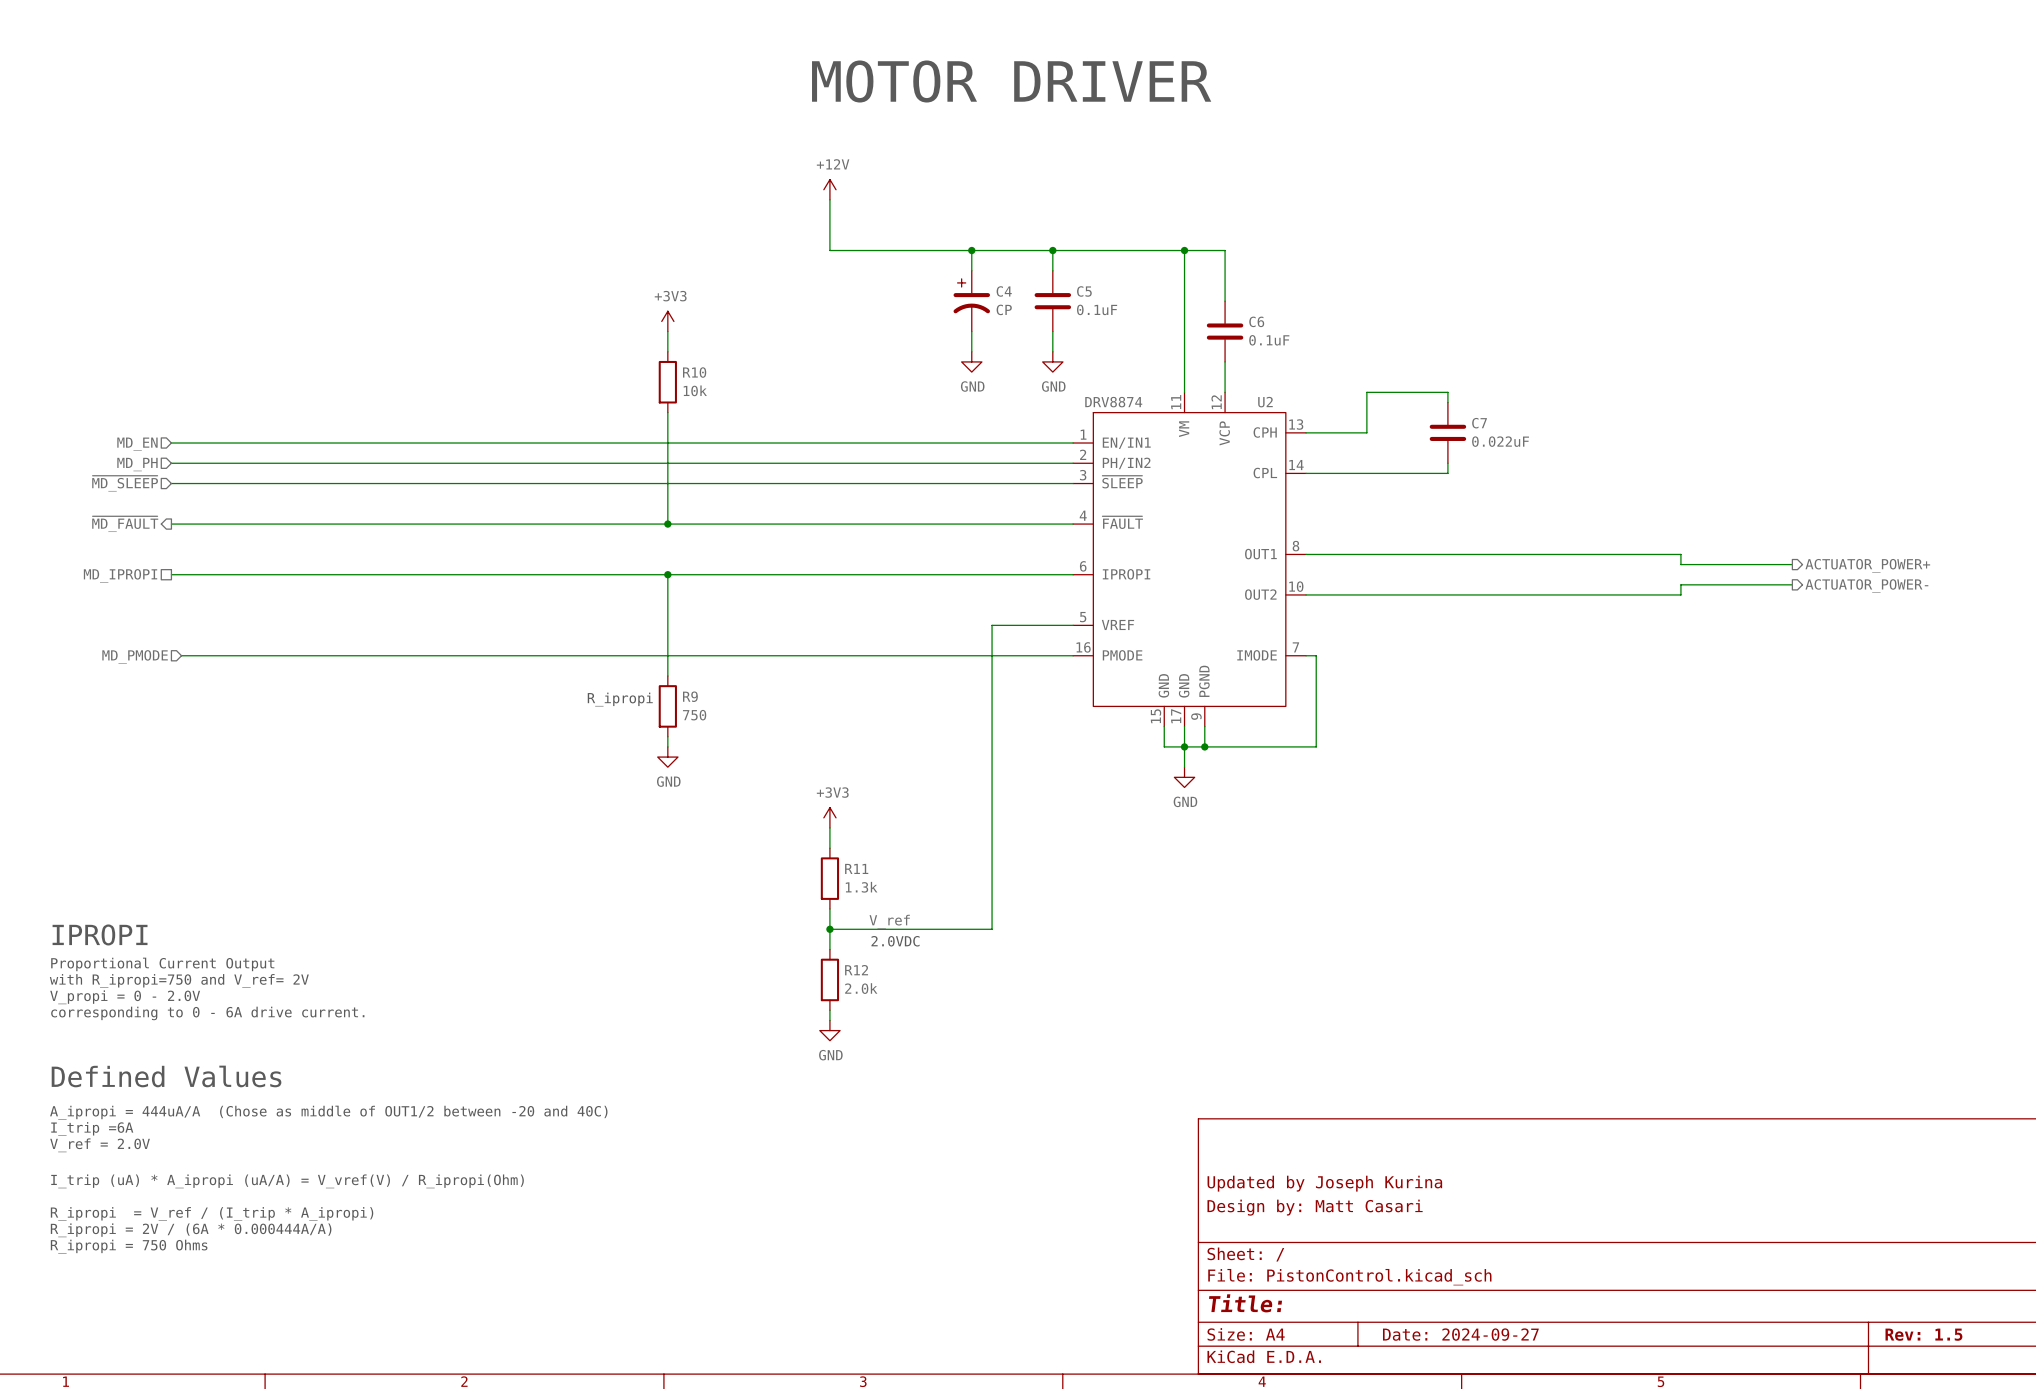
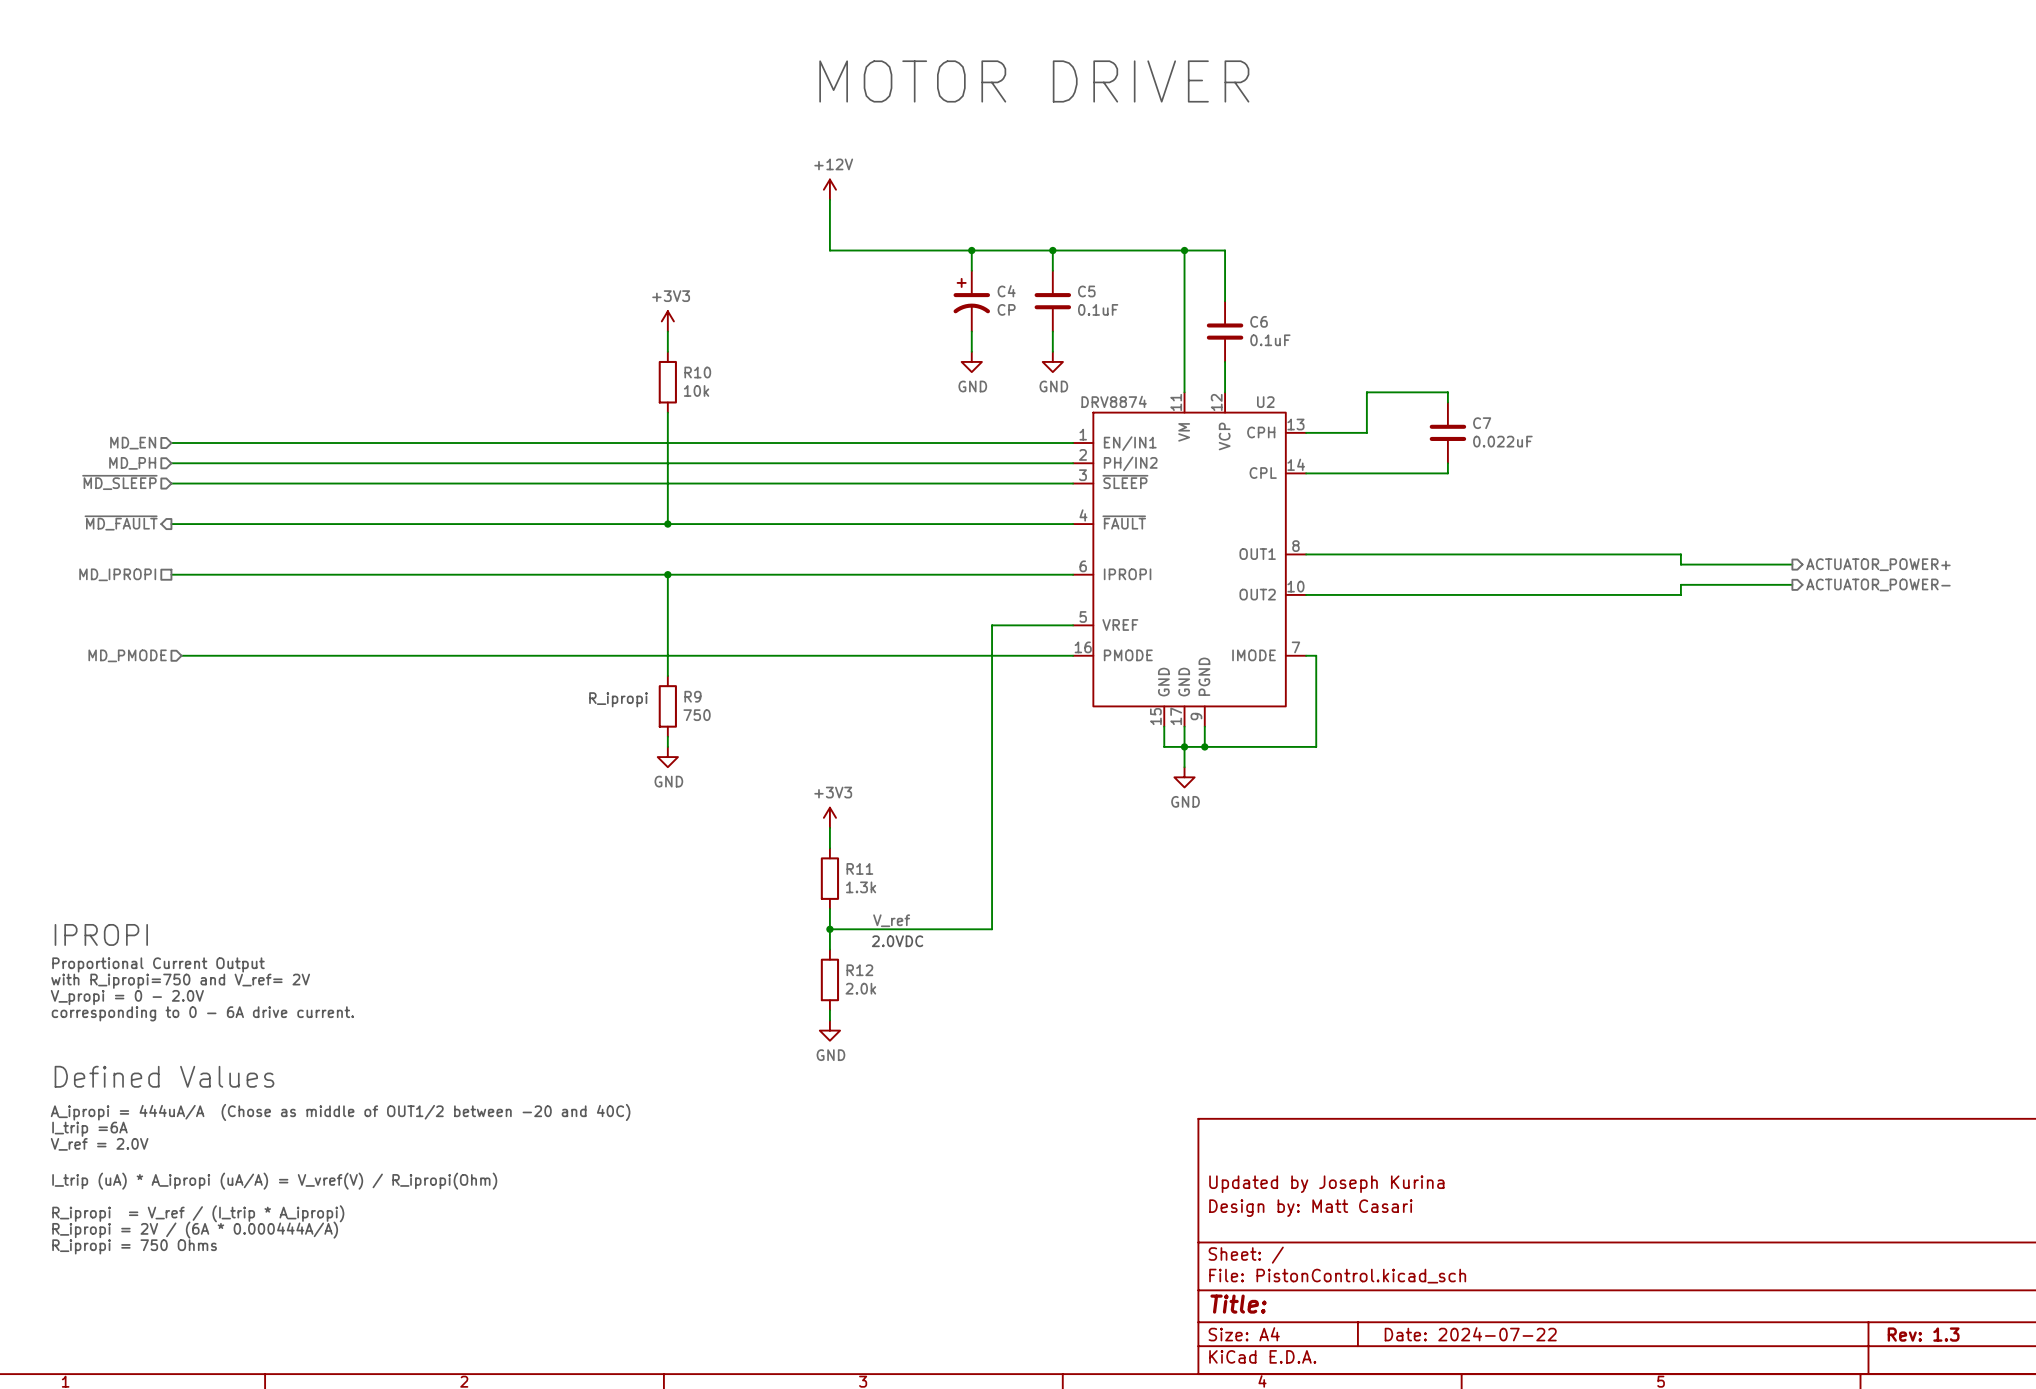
title block: Date: 2024-09-27 (1460, 1334) -> Date: 2024-07-22 (1470, 1334)
title block: Rev: 1.5 (1923, 1334) -> Rev: 1.3 (1923, 1334)

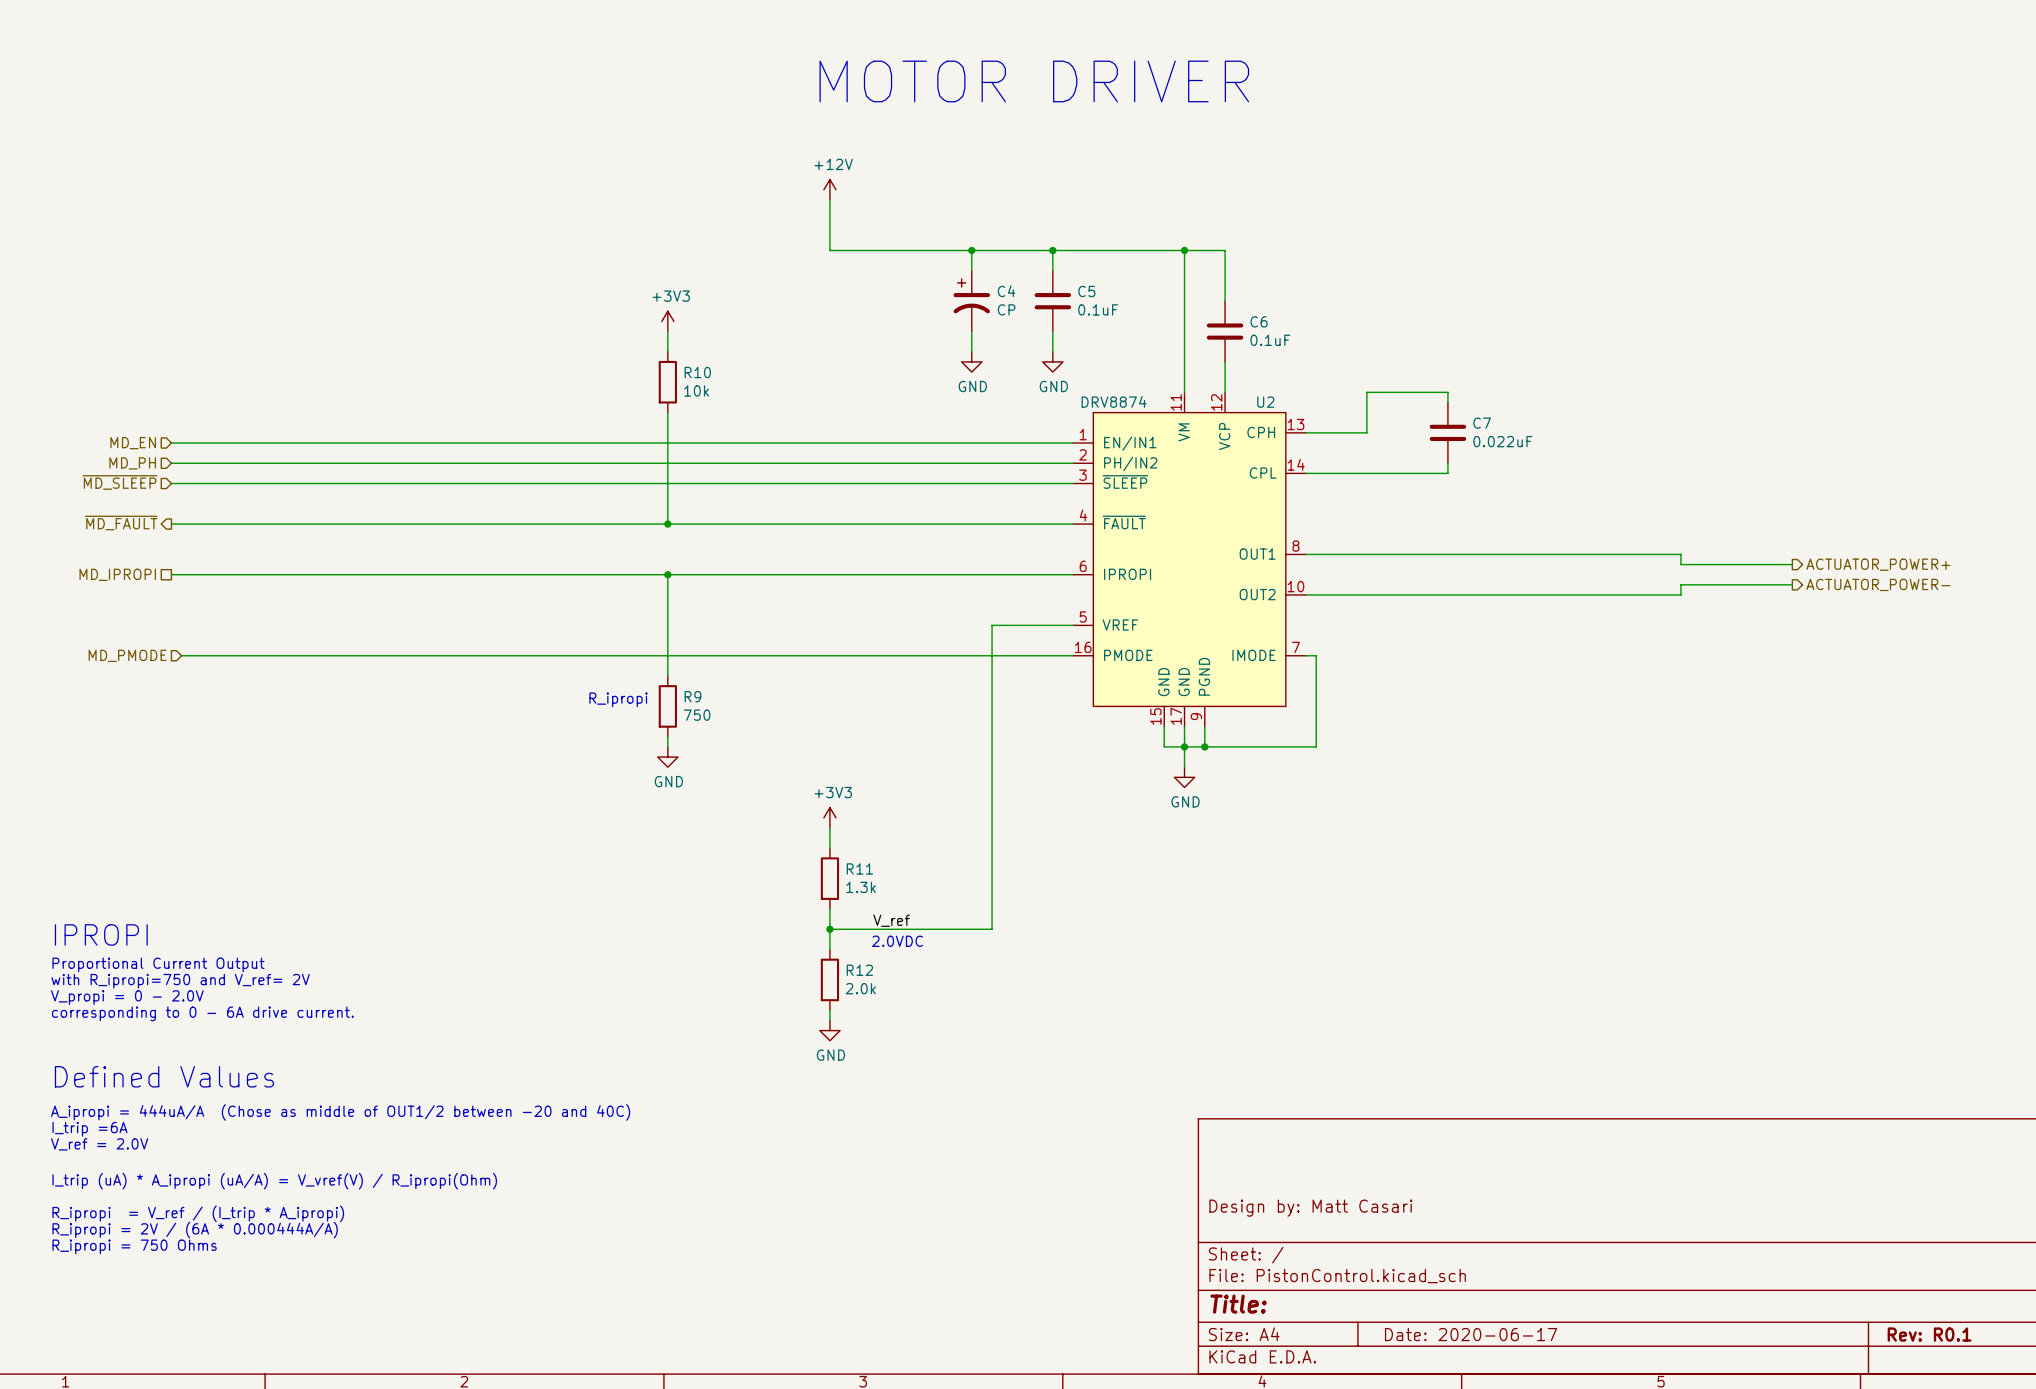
title block: Updated by Joseph Kurina (1326, 1184) -> none
title block: Date: 2024-07-22 (1470, 1334) -> Date: 2020-06-17 (1471, 1334)
title block: Rev: 1.3 (1923, 1334) -> Rev: R0.1 (1929, 1334)

